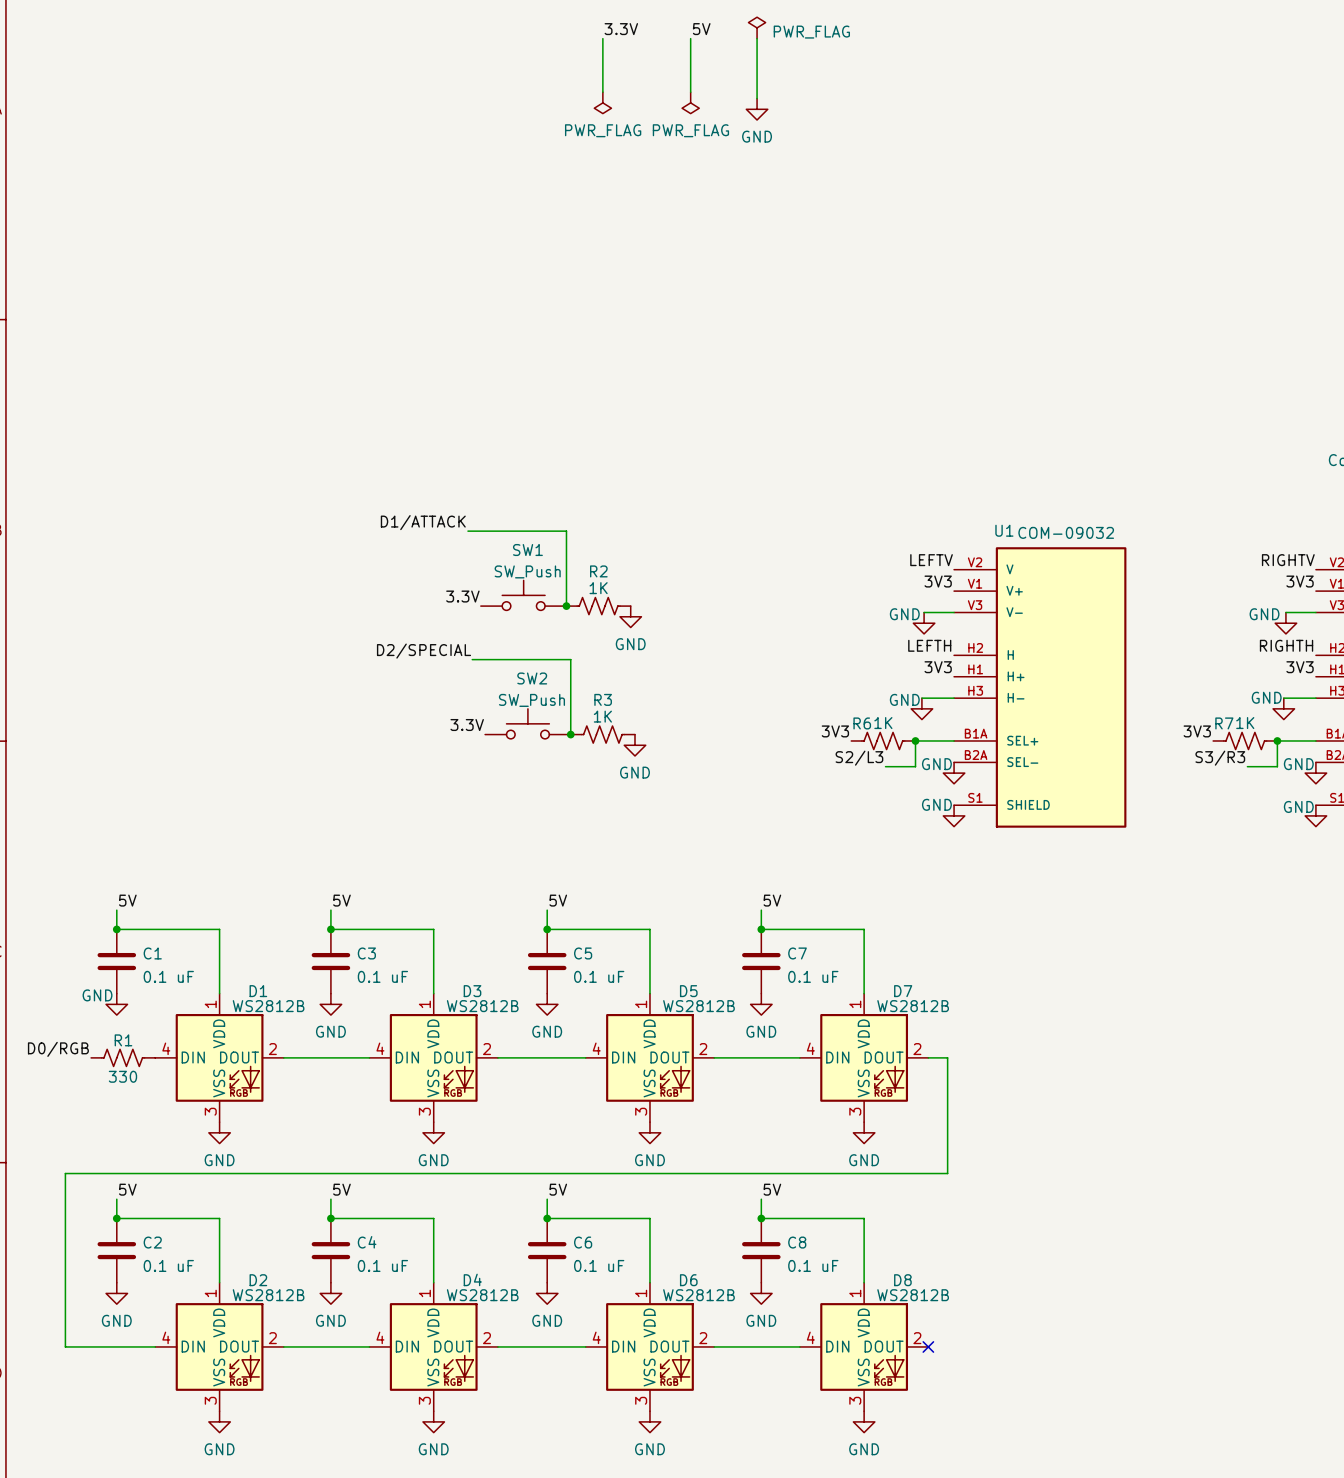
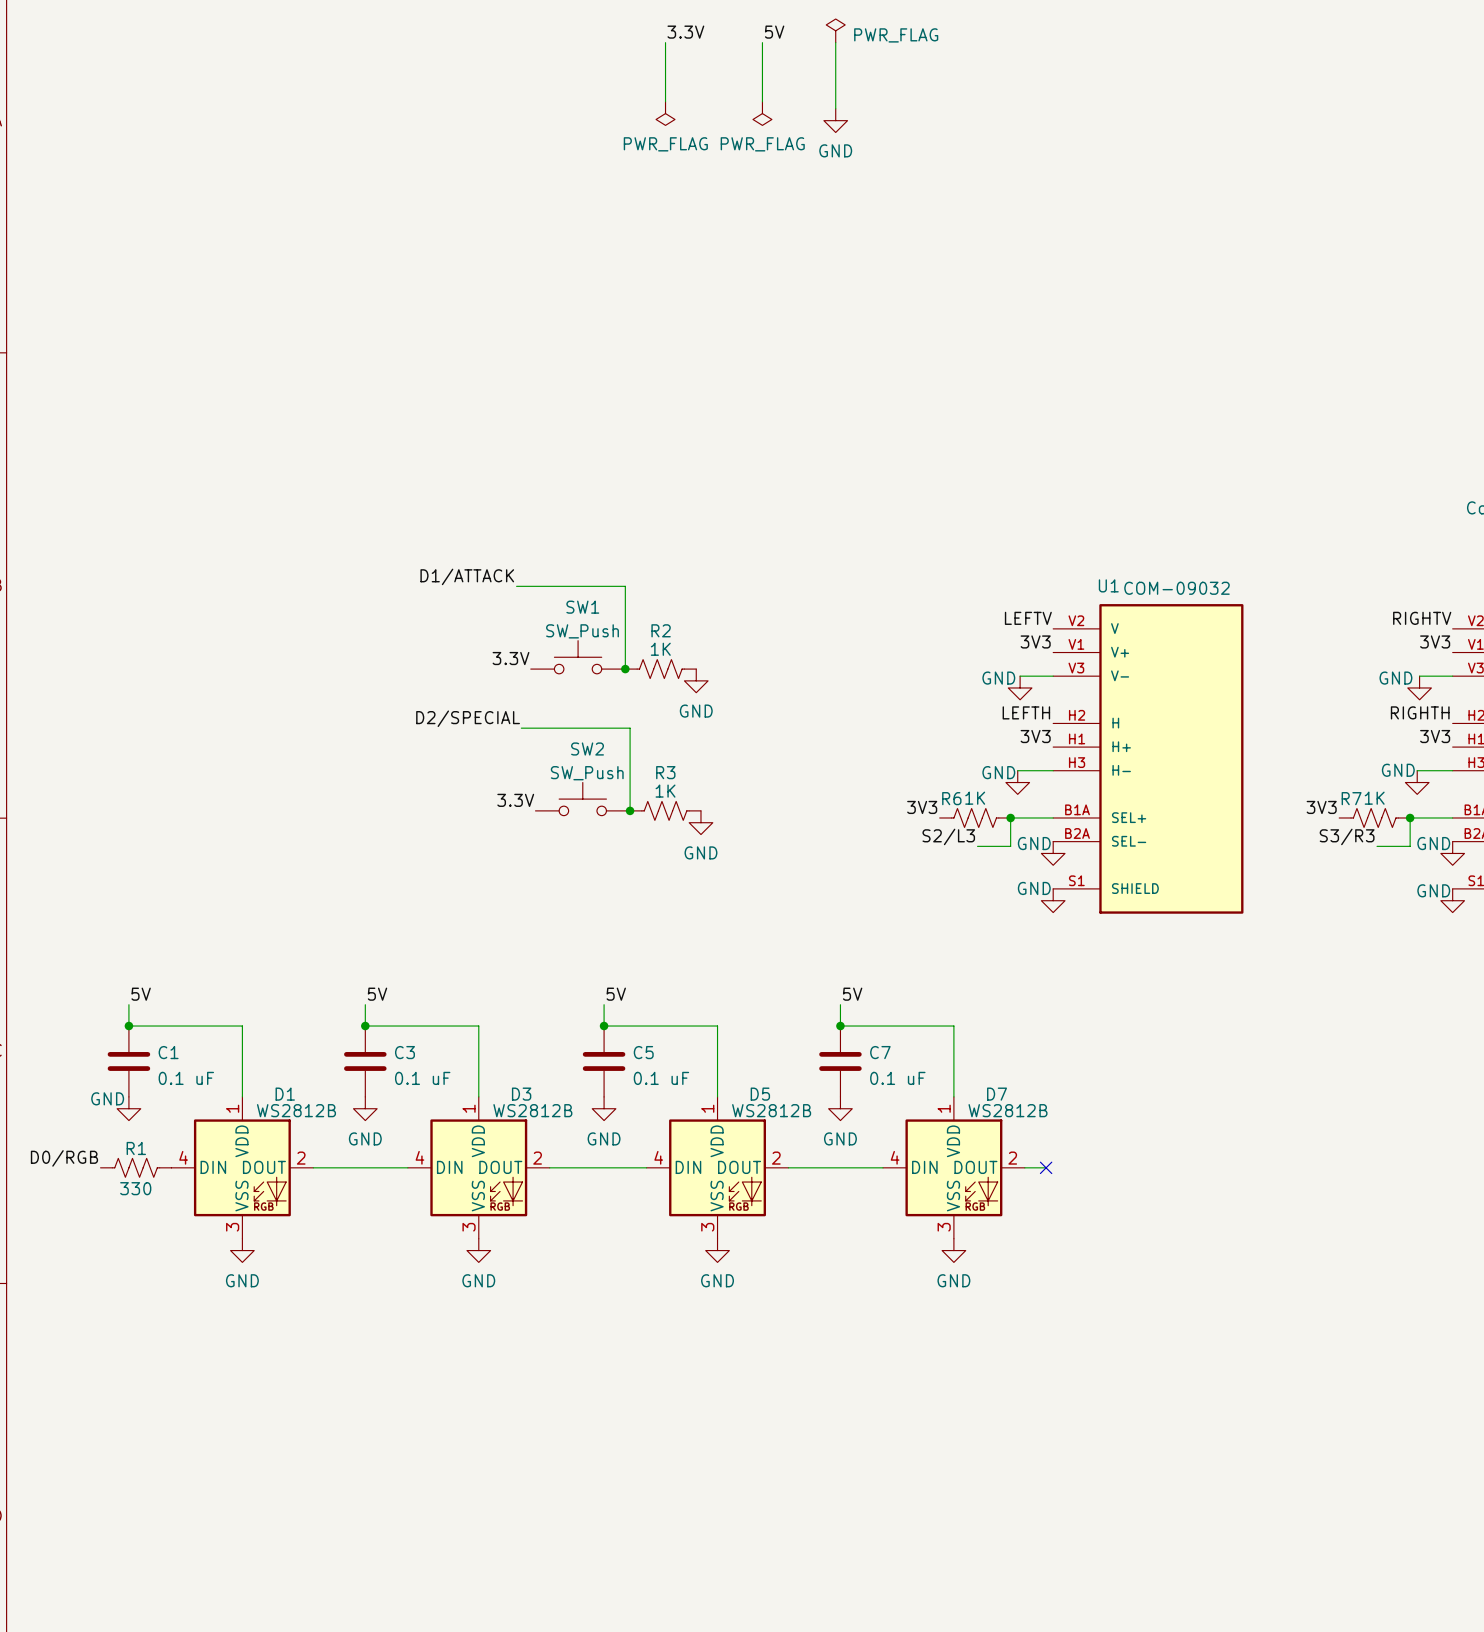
wire: (947, 1057) (947, 1173) (65, 1173) (65, 1346) (155, 1346) -> none
no-connect mark: none -> (1046, 1167)
label: 5V (127, 1189) -> none
label: 5V (341, 1189) -> none
label: 5V (558, 1189) -> none
label: 5V (772, 1189) -> none
wire: (116, 1199) (116, 1218) (219, 1218) (219, 1282) -> none
wire: (330, 1199) (330, 1218) (433, 1218) (433, 1282) -> none
wire: (547, 1199) (547, 1218) (649, 1218) (649, 1282) -> none
wire: (761, 1199) (761, 1218) (864, 1218) (864, 1282) -> none
junction: (116, 1218) -> none
junction: (330, 1218) -> none
junction: (547, 1218) -> none
junction: (761, 1218) -> none
C2: 0.1 uF (116, 1250) -> none
C4: 0.1 uF (330, 1250) -> none
C6: 0.1 uF (547, 1250) -> none
C8: 0.1 uF (761, 1250) -> none
power symbol: GND (116, 1293) -> none
power symbol: GND (330, 1293) -> none
power symbol: GND (547, 1293) -> none
power symbol: GND (761, 1293) -> none
D2: WS2812B (219, 1346) -> none
wire: (283, 1346) (369, 1346) -> none
D4: WS2812B (433, 1346) -> none
wire: (497, 1346) (585, 1346) -> none
D6: WS2812B (649, 1346) -> none
wire: (714, 1346) (799, 1346) -> none
D8: WS2812B (864, 1346) -> none
no-connect mark: (928, 1346) -> none
power symbol: GND (219, 1421) -> none
power symbol: GND (433, 1421) -> none
power symbol: GND (649, 1421) -> none
power symbol: GND (864, 1421) -> none

